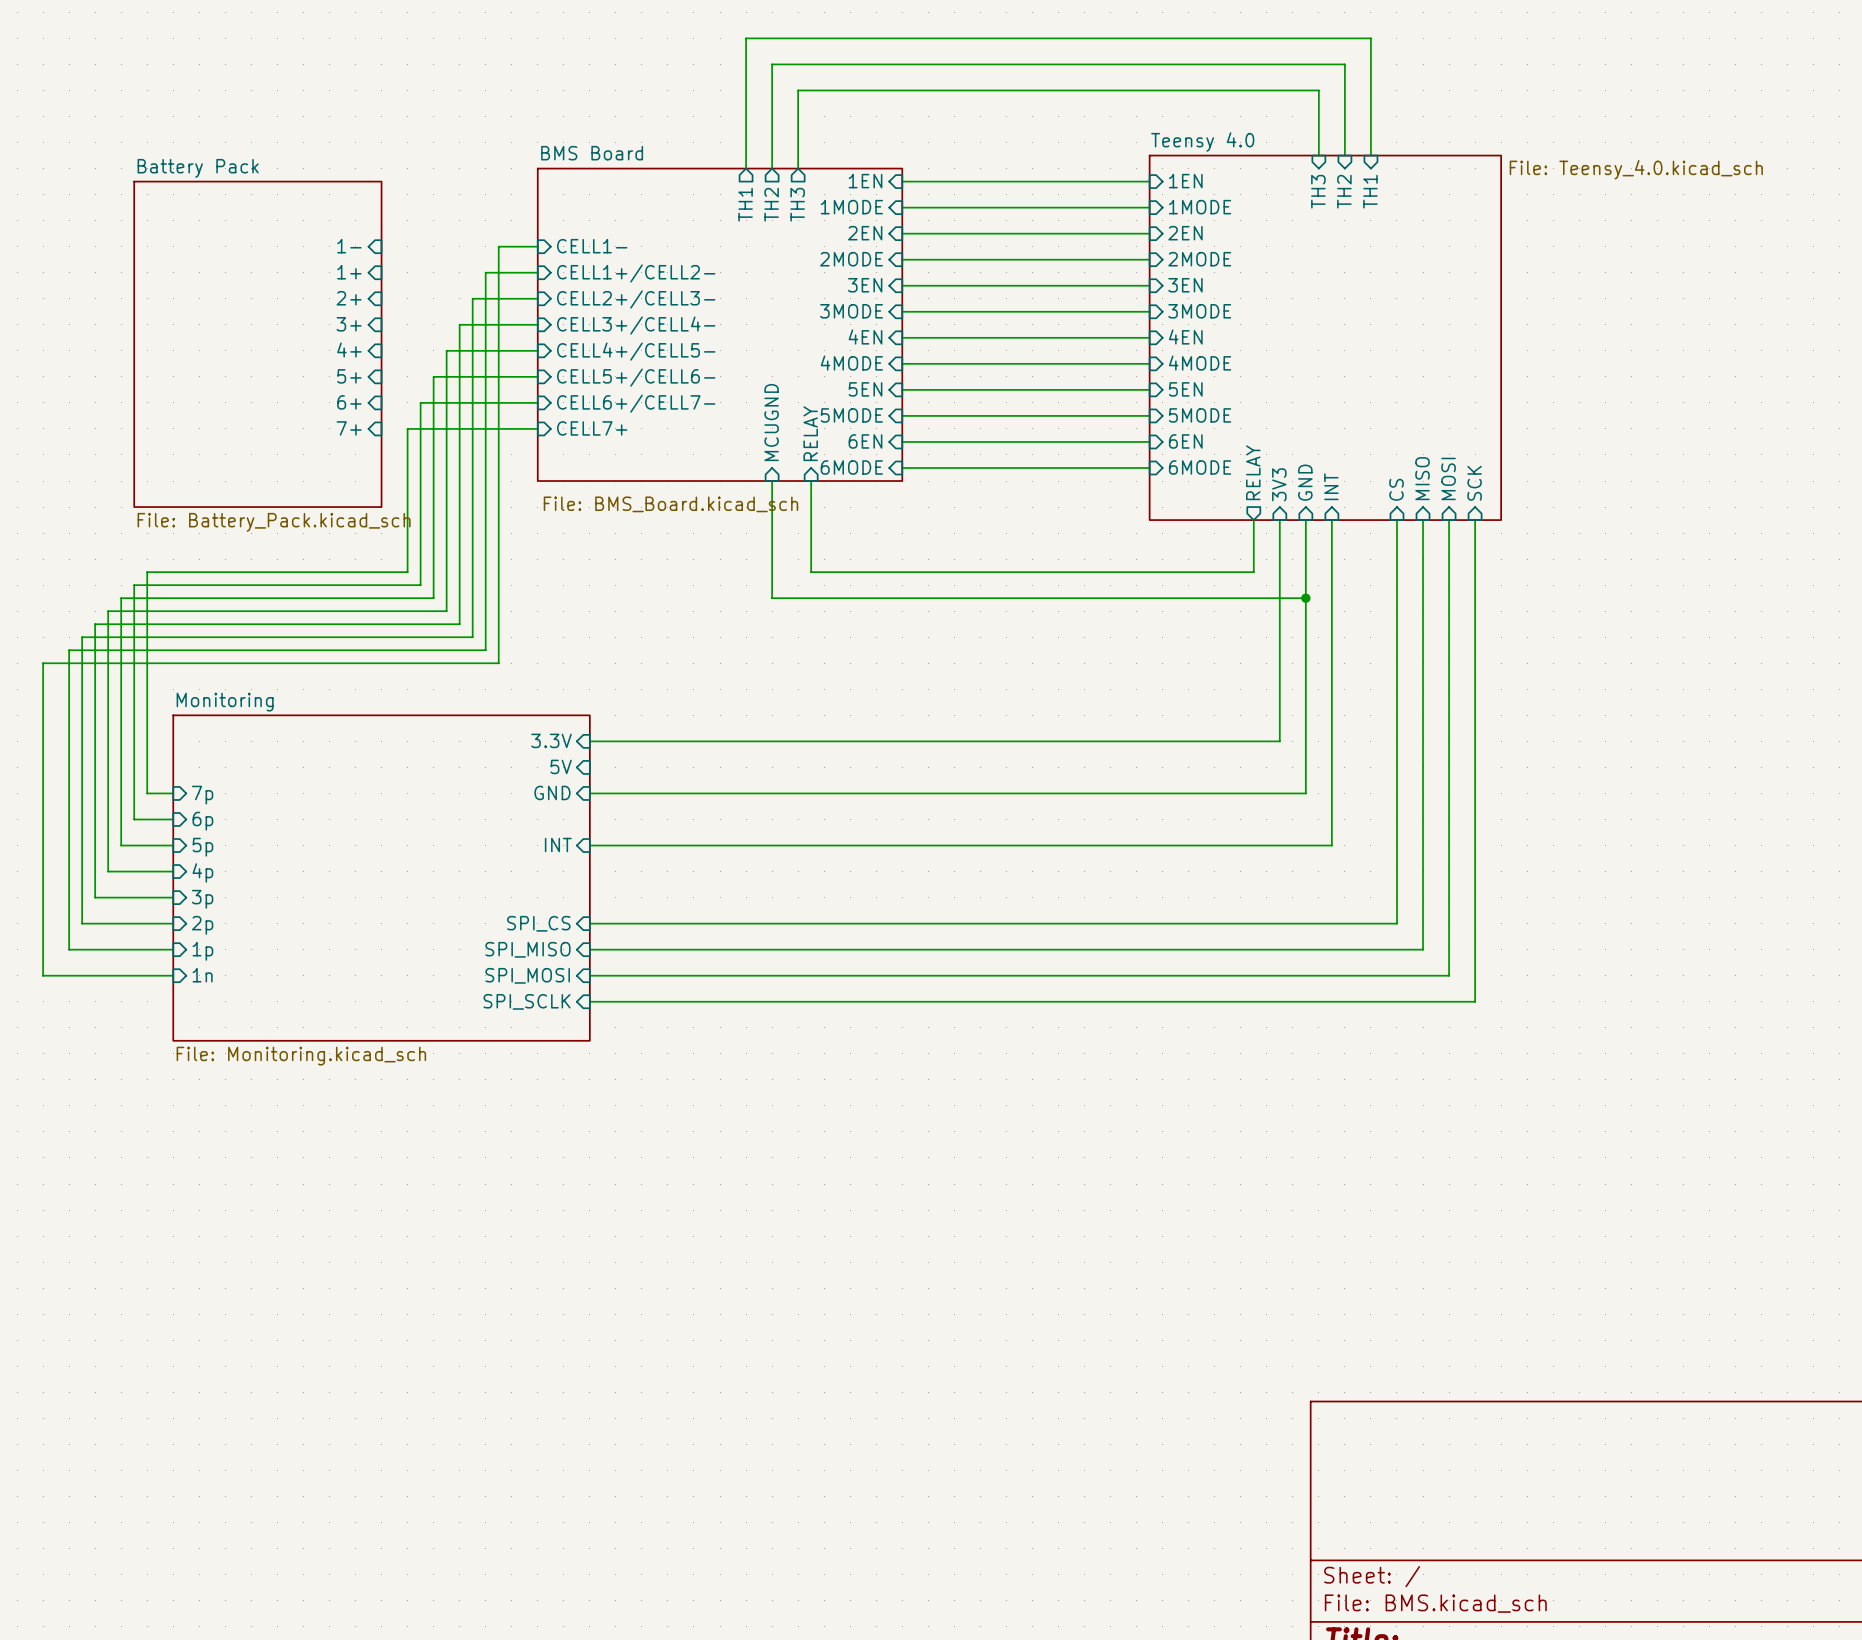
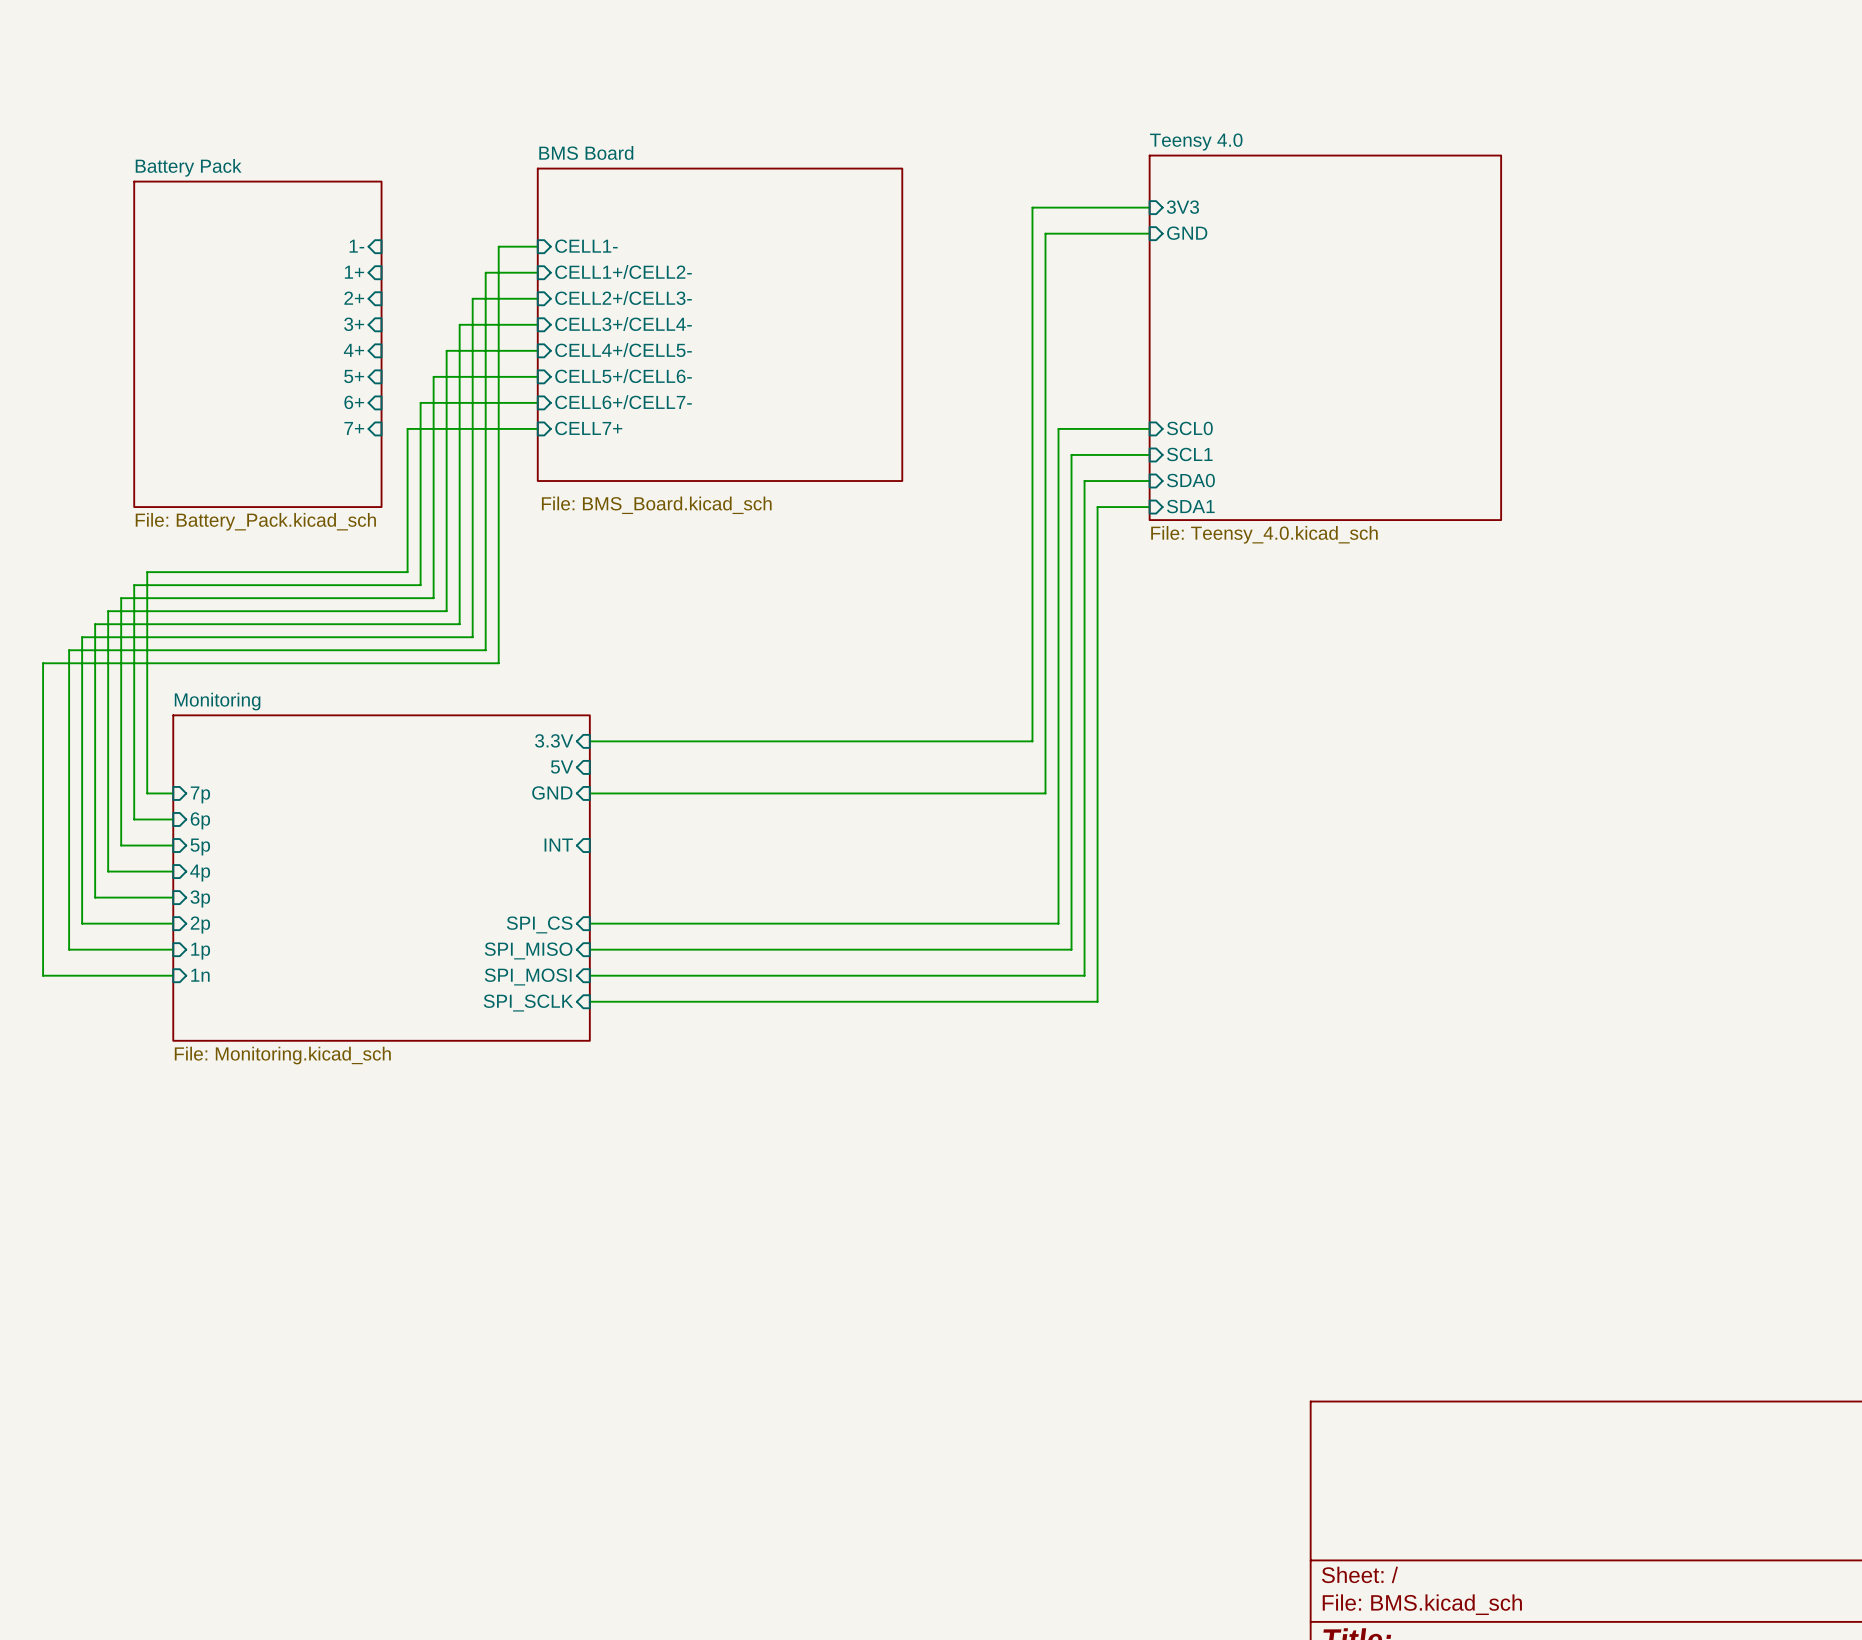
wire: (1318, 155) (1318, 90) (798, 90) (798, 168) -> none
wire: (1344, 155) (1344, 64) (772, 64) (772, 168) -> none
wire: (1370, 155) (1370, 38) (746, 38) (746, 168) -> none
sheet Teensy 4.0 value position: File: Teensy_4.0.kicad_sch (1636, 169) -> File: Teensy_4.0.kicad_sch (1264, 534)
sheet pin: 1EN (865, 181) -> none
wire: (902, 181) (1149, 181) -> none
sheet pin: 1EN (1185, 181) -> none
sheet pin: TH3 (1318, 191) -> none
sheet pin: TH2 (1344, 191) -> none
sheet pin: TH1 (1370, 191) -> none
sheet pin: TH1 (745, 204) -> none
sheet pin: TH2 (771, 204) -> none
sheet pin: TH3 (797, 204) -> none
sheet pin: 1MODE (851, 207) -> none
wire: (902, 207) (1032, 207) -> none
sheet pin: 1MODE (1200, 207) -> 3V3 (1182, 207)
sheet pin: 2EN (865, 233) -> none
wire: (902, 233) (1045, 233) -> none
sheet pin: 2EN (1185, 233) -> GND (1187, 233)
sheet pin: 2MODE (851, 259) -> none
wire: (902, 259) (1149, 259) -> none
sheet pin: 2MODE (1199, 259) -> none
sheet pin: 3EN (865, 285) -> none
wire: (902, 285) (1149, 285) -> none
sheet pin: 3EN (1185, 285) -> none
sheet pin: 3MODE (851, 311) -> none
wire: (902, 311) (1149, 311) -> none
sheet pin: 3MODE (1199, 311) -> none
sheet pin: 4EN (865, 337) -> none
wire: (902, 337) (1149, 337) -> none
sheet pin: 4EN (1185, 337) -> none
sheet pin: 4MODE (851, 363) -> none
wire: (902, 363) (1149, 363) -> none
sheet pin: 4MODE (1200, 363) -> none
sheet pin: 5EN (865, 389) -> none
wire: (902, 389) (1149, 389) -> none
sheet pin: 5EN (1185, 389) -> none
sheet pin: 5MODE (851, 415) -> none
wire: (902, 415) (1149, 415) -> none
sheet pin: 5MODE (1200, 415) -> none
sheet pin: MCUGND (771, 422) -> none
sheet pin: none -> SCL0 (1189, 428)
sheet pin: RELAY (810, 433) -> none
sheet pin: 6EN (865, 441) -> none
wire: (902, 441) (1149, 441) -> none
sheet pin: 6EN (1185, 441) -> none
sheet pin: none -> SCL1 (1189, 454)
sheet pin: 6MODE (851, 467) -> none
wire: (902, 467) (1149, 467) -> none
sheet pin: 6MODE (1200, 467) -> none
sheet pin: RELAY (1253, 472) -> none
sheet pin: MISO (1422, 478) -> none
sheet pin: MOSI (1448, 478) -> none
sheet pin: none -> SDA0 (1190, 480)
wire: (772, 481) (772, 598) (1305, 598) -> none
wire: (811, 481) (811, 572) (1253, 572) (1253, 520) -> none
sheet pin: GND (1305, 482) -> none
sheet pin: SCK (1474, 483) -> none
sheet pin: 3V3 (1279, 484) -> none
sheet pin: INT (1331, 486) -> none
sheet pin: CS (1396, 489) -> none
sheet pin: none -> SDA1 (1190, 506)
wire: (1279, 520) (1279, 741) (1032, 741) -> (1032, 207) (1032, 741)
wire: (1305, 520) (1305, 793) (1045, 793) -> (1045, 233) (1045, 793)
wire: (1331, 520) (1331, 845) (589, 845) -> none
wire: (1396, 520) (1396, 923) (1058, 923) -> (1149, 428) (1058, 428) (1058, 923)
wire: (1423, 520) (1423, 949) (1071, 949) -> (1149, 454) (1071, 454) (1071, 949)
wire: (1449, 520) (1449, 975) (1084, 975) -> (1149, 481) (1084, 481) (1084, 975)
wire: (1475, 520) (1475, 1001) (1097, 1001) -> (1149, 507) (1097, 507) (1097, 1001)
junction: (1305, 598) -> none

